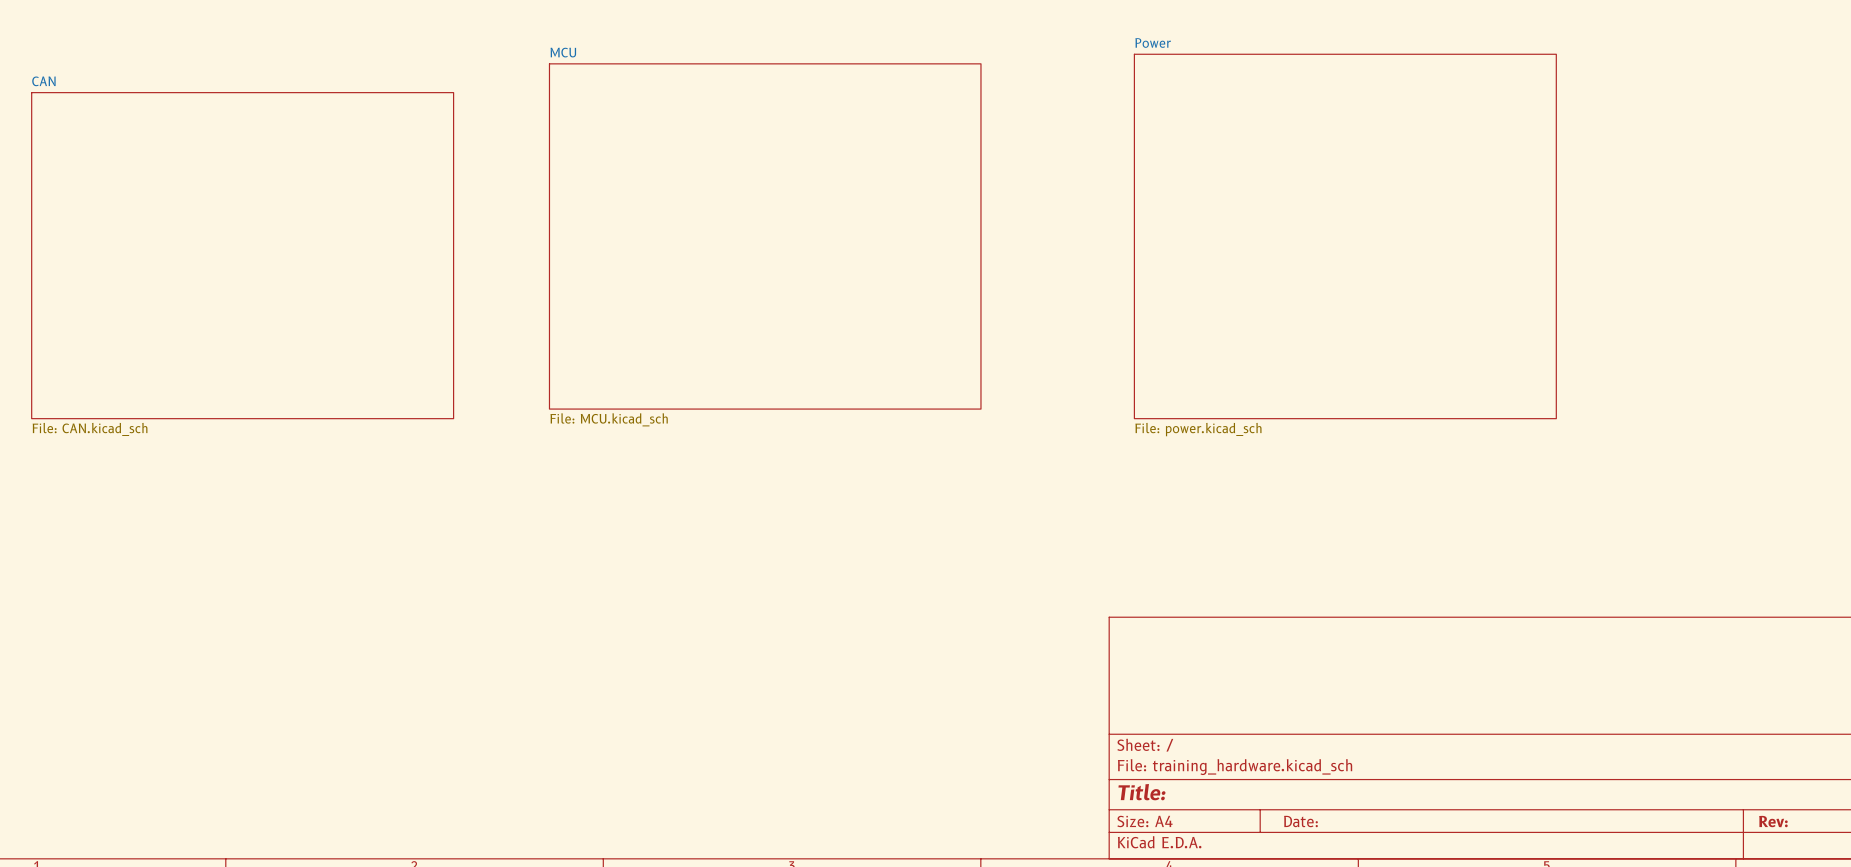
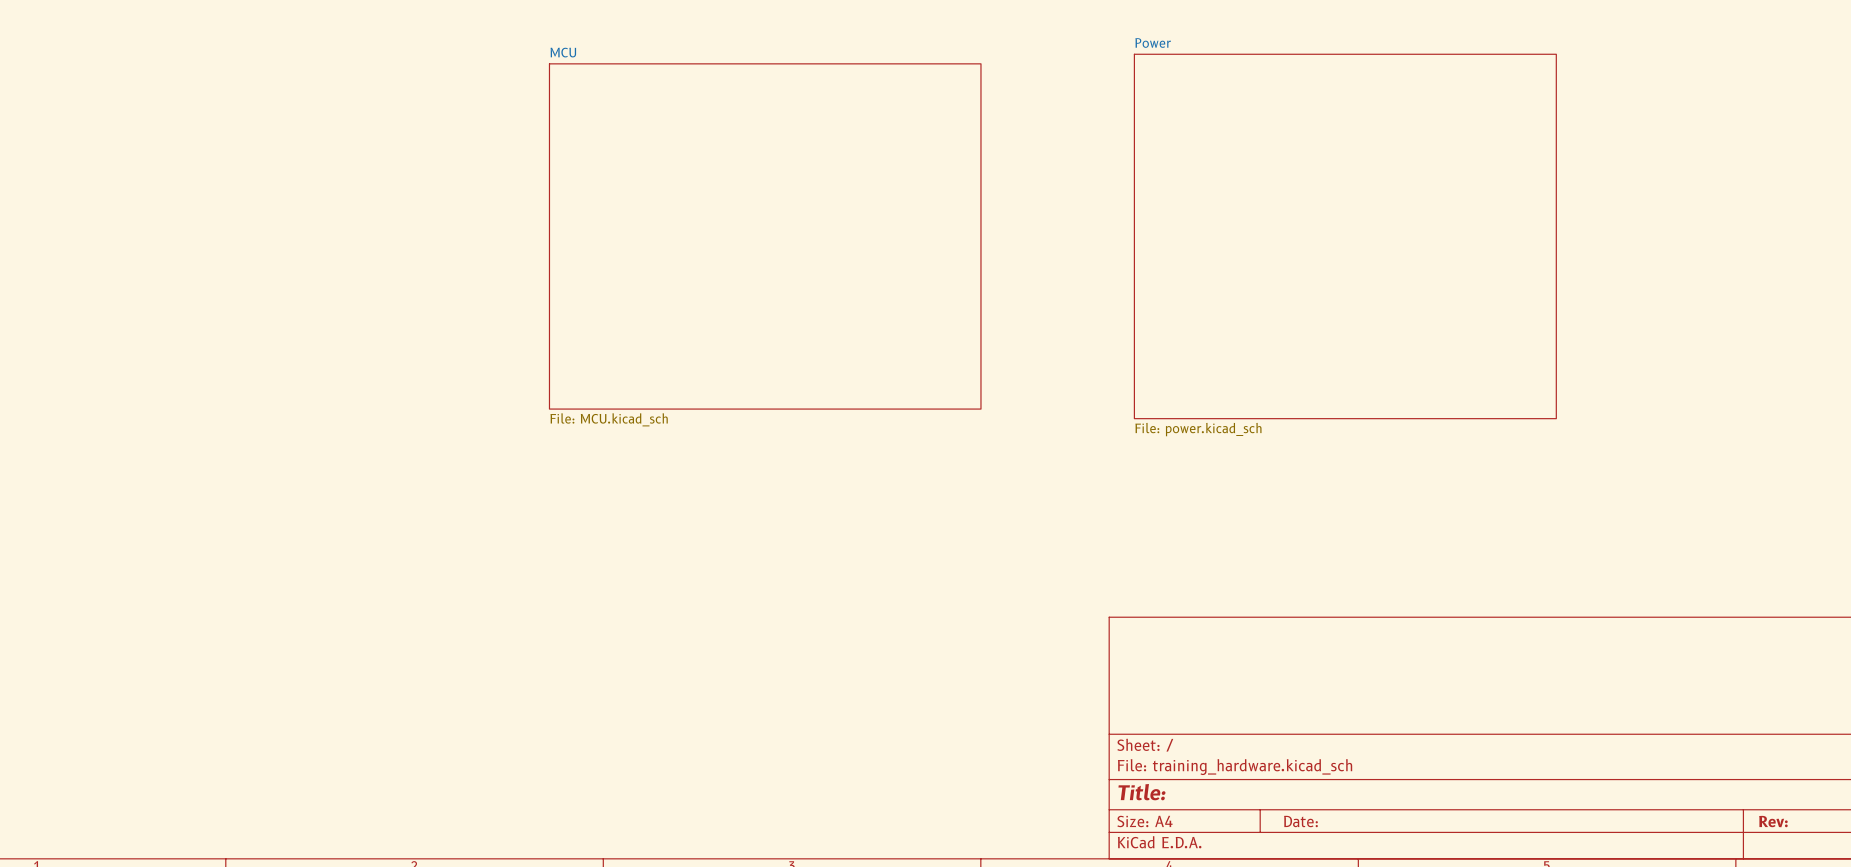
sheet CAN: File: CAN.kicad_sch (242, 255) -> none

